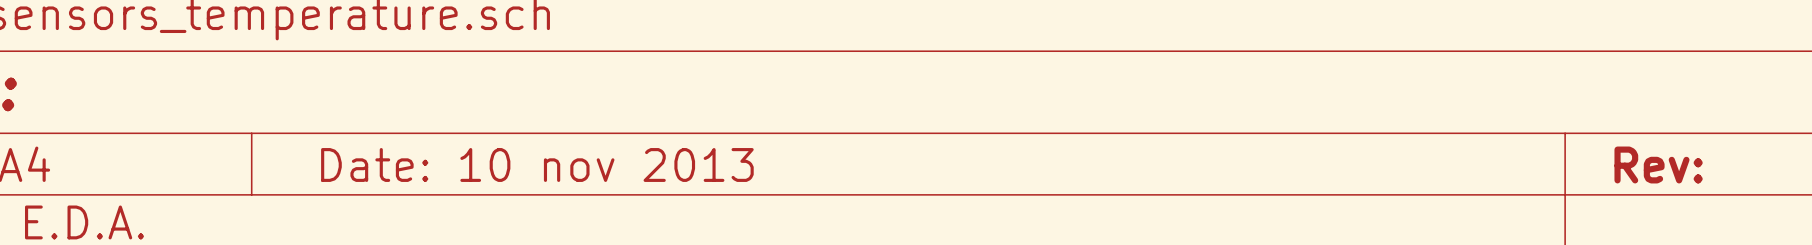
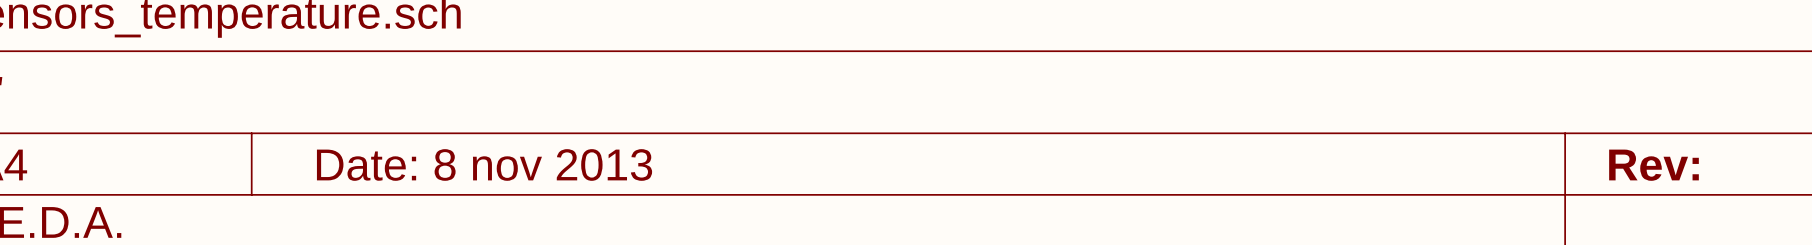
title block: Date: 10 nov 2013 (537, 164) -> Date: 8 nov 2013 (484, 164)

